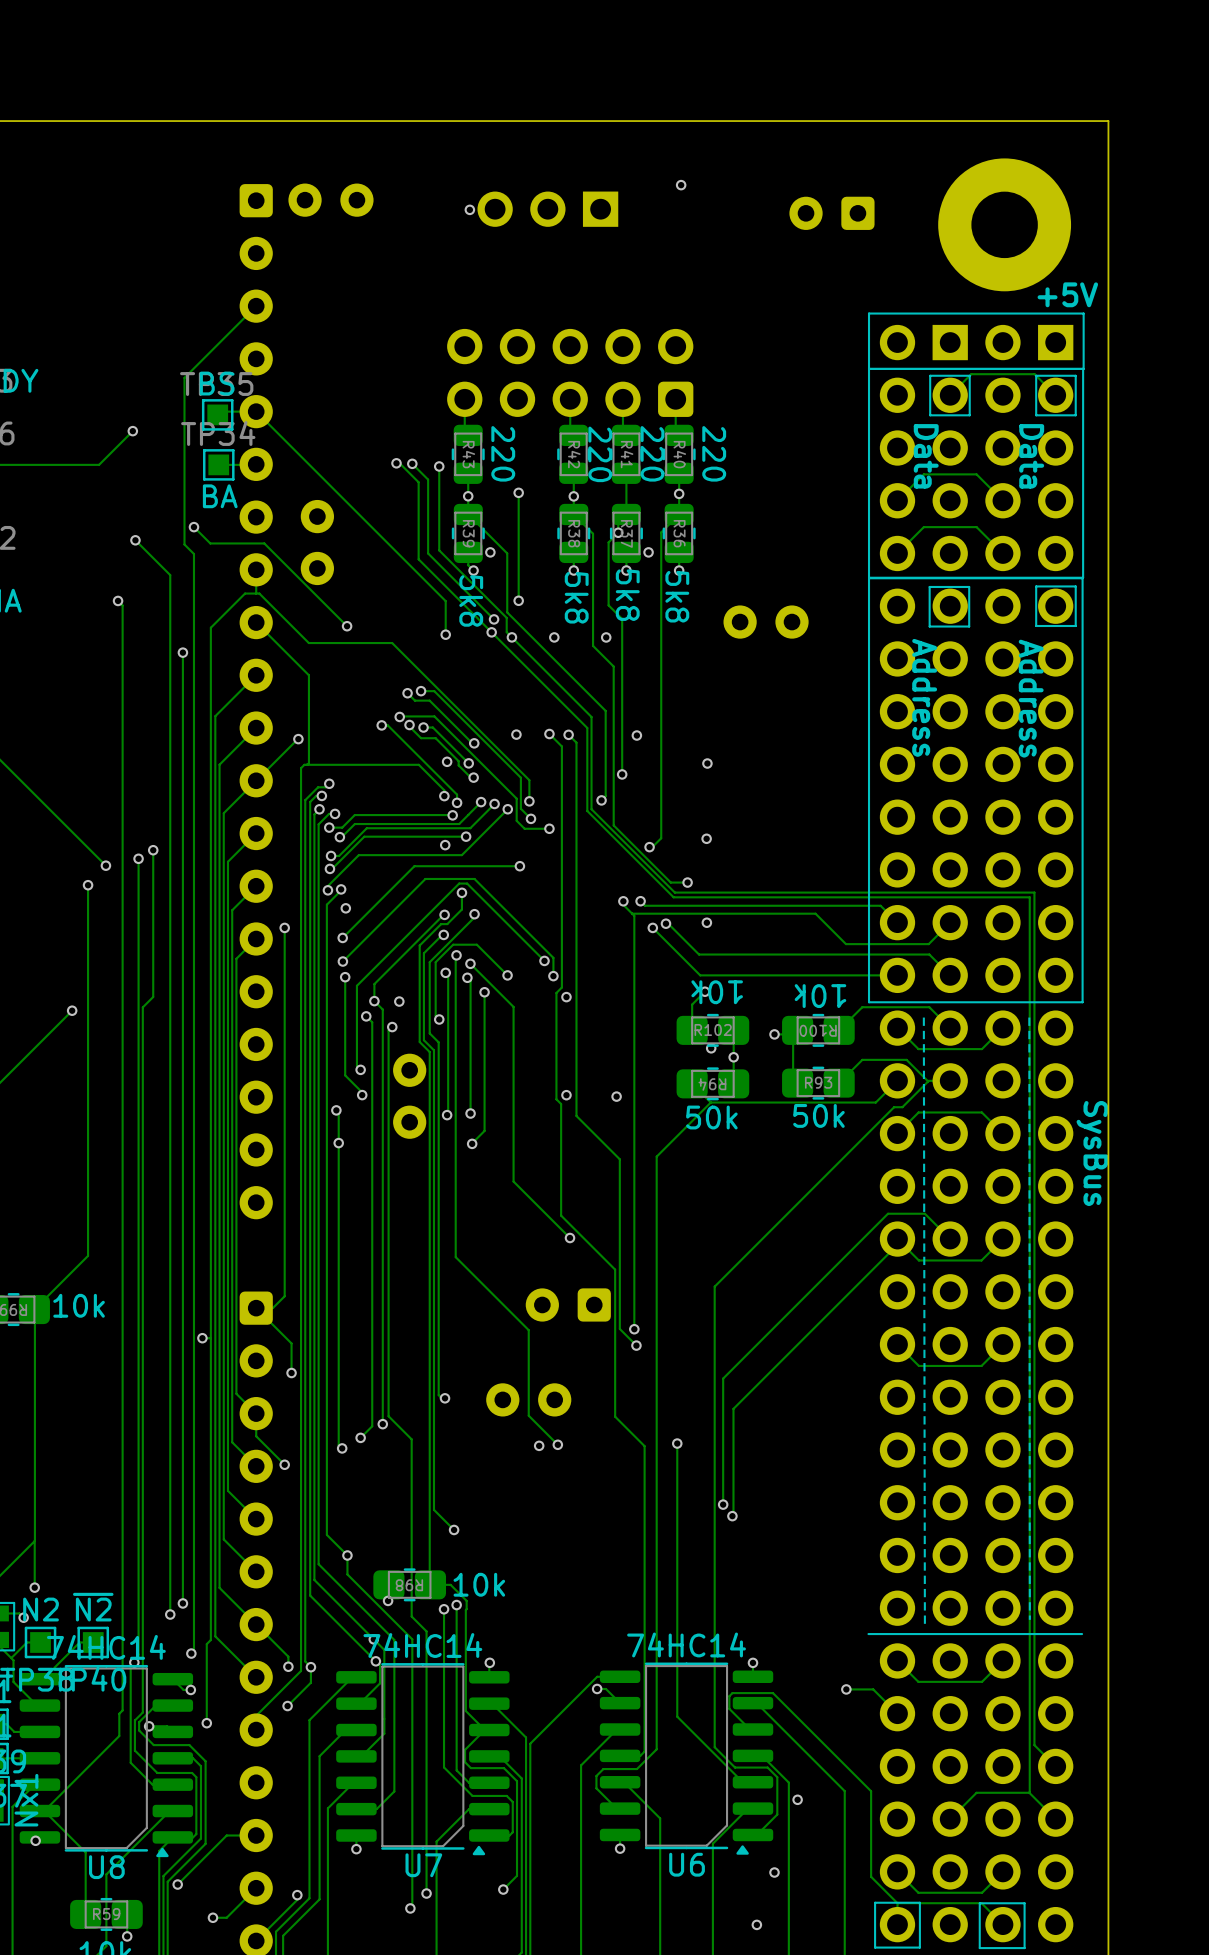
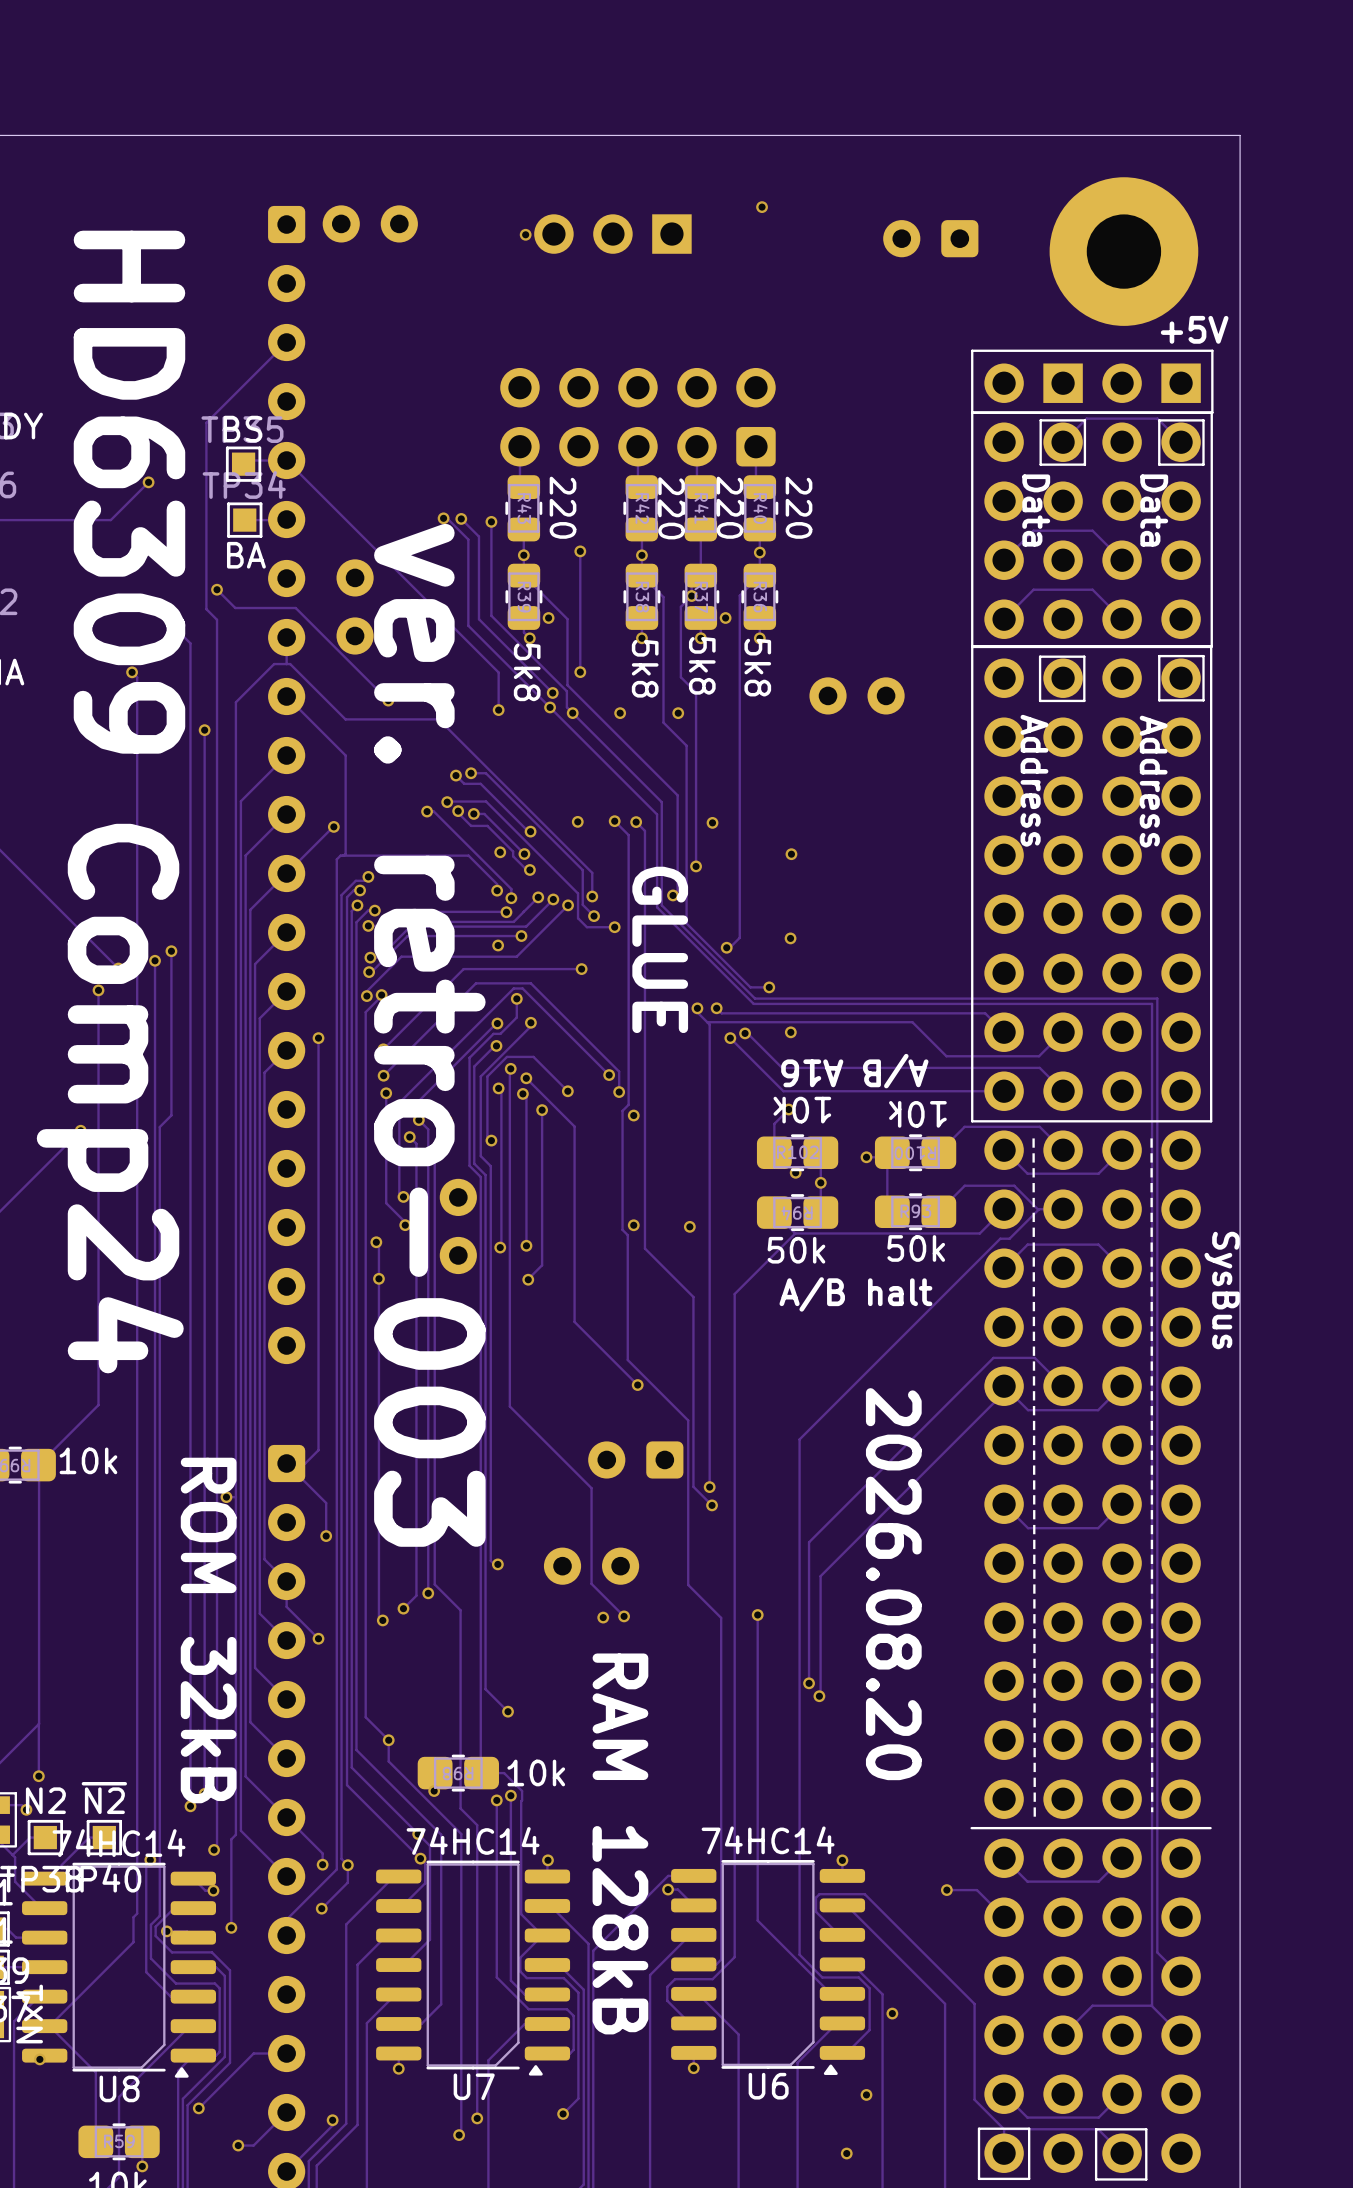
text: none -> HD6309 (129, 492)
text: none -> GLUE (660, 949)
text: none -> ver. retro-003 (429, 1035)
text: none -> A/B A16 (854, 1071)
text: none -> Comp24 (110, 1098)
text: none -> A/B halt (855, 1294)
text: none -> 2026.08.20 (893, 1584)
text: none -> ROM 32kB (208, 1630)
text: none -> RAM 128kB (620, 1843)

